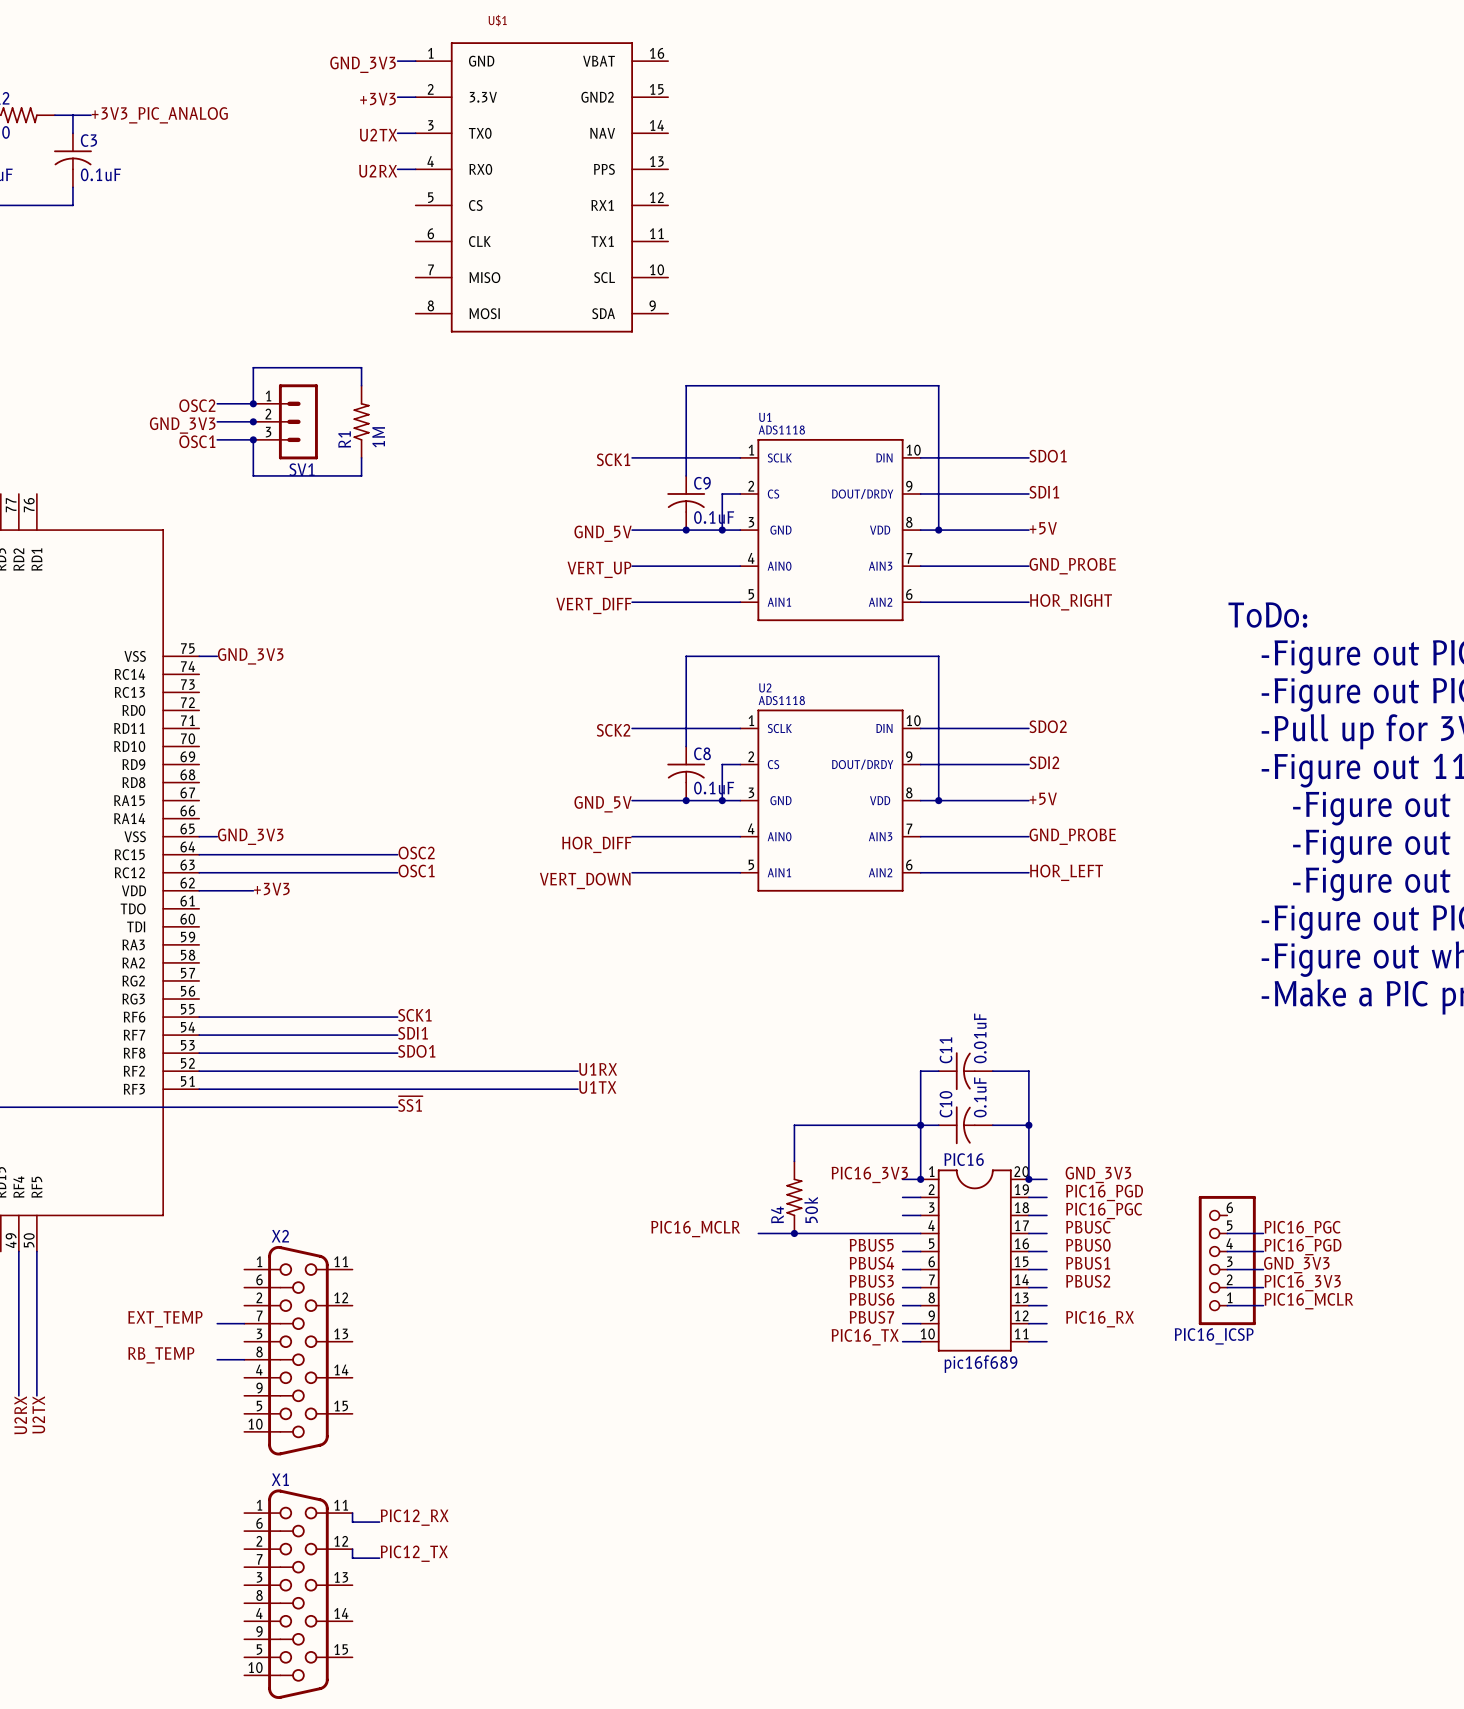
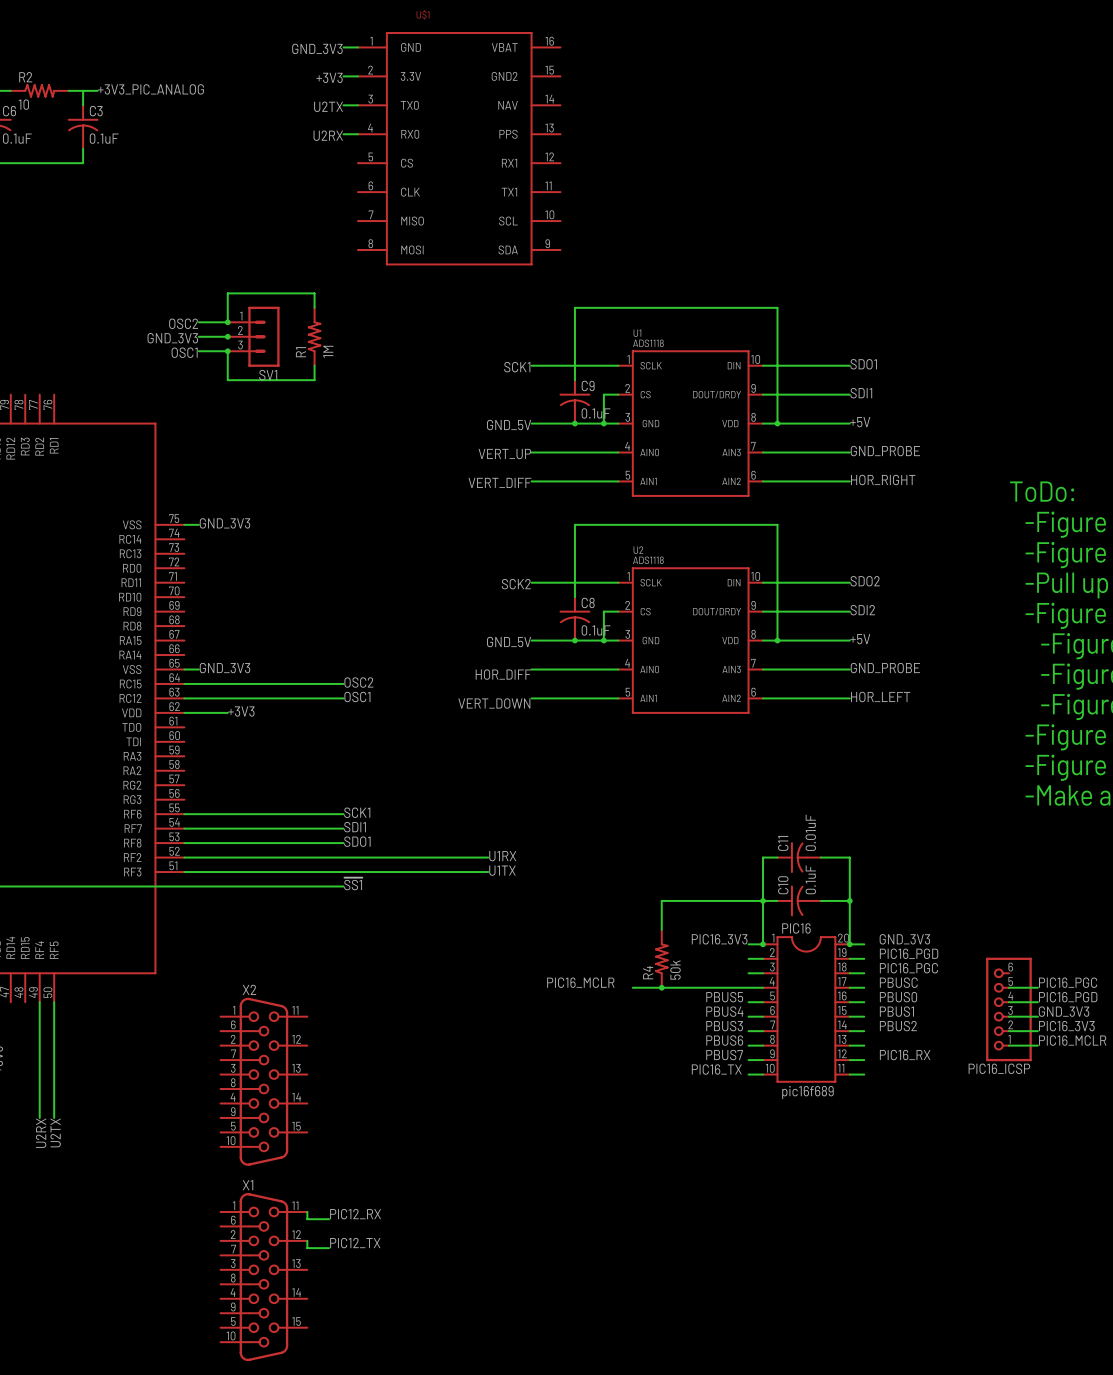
label: EXT_TEMP (165, 1319) -> none
wire: (217, 1323) (244, 1323) -> none
label: RB_TEMP (161, 1355) -> none
wire: (217, 1359) (244, 1359) -> none

